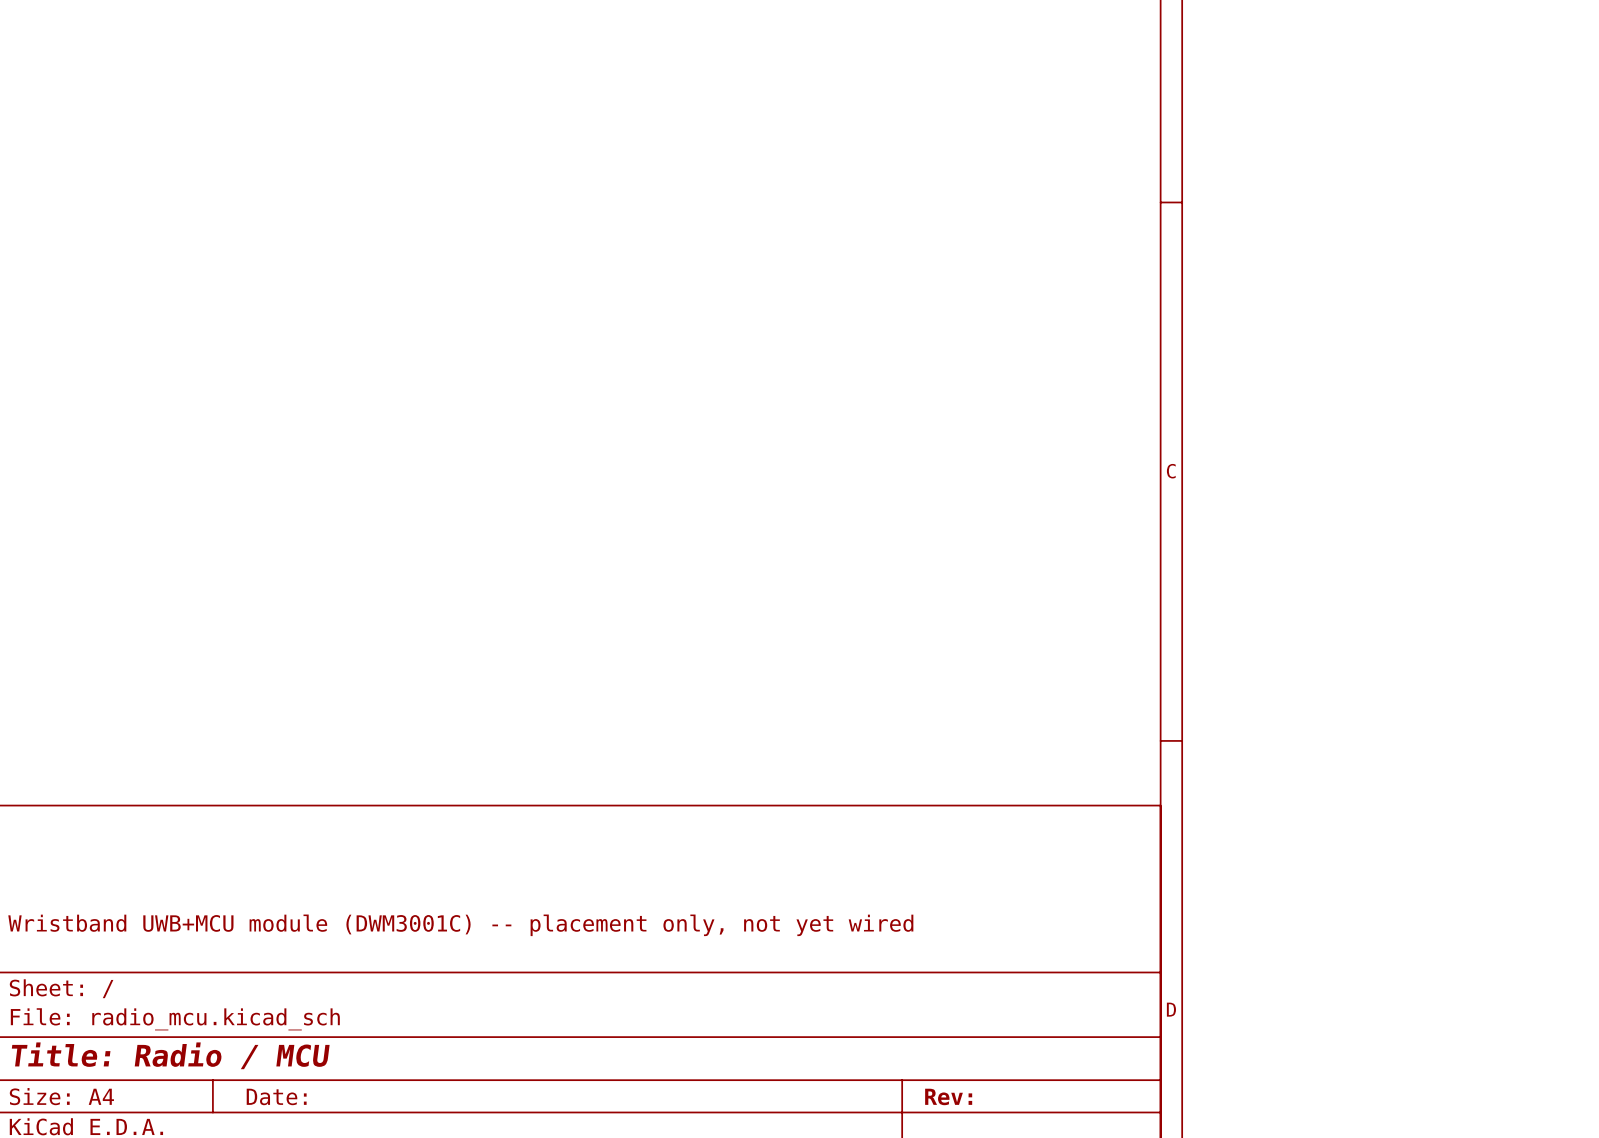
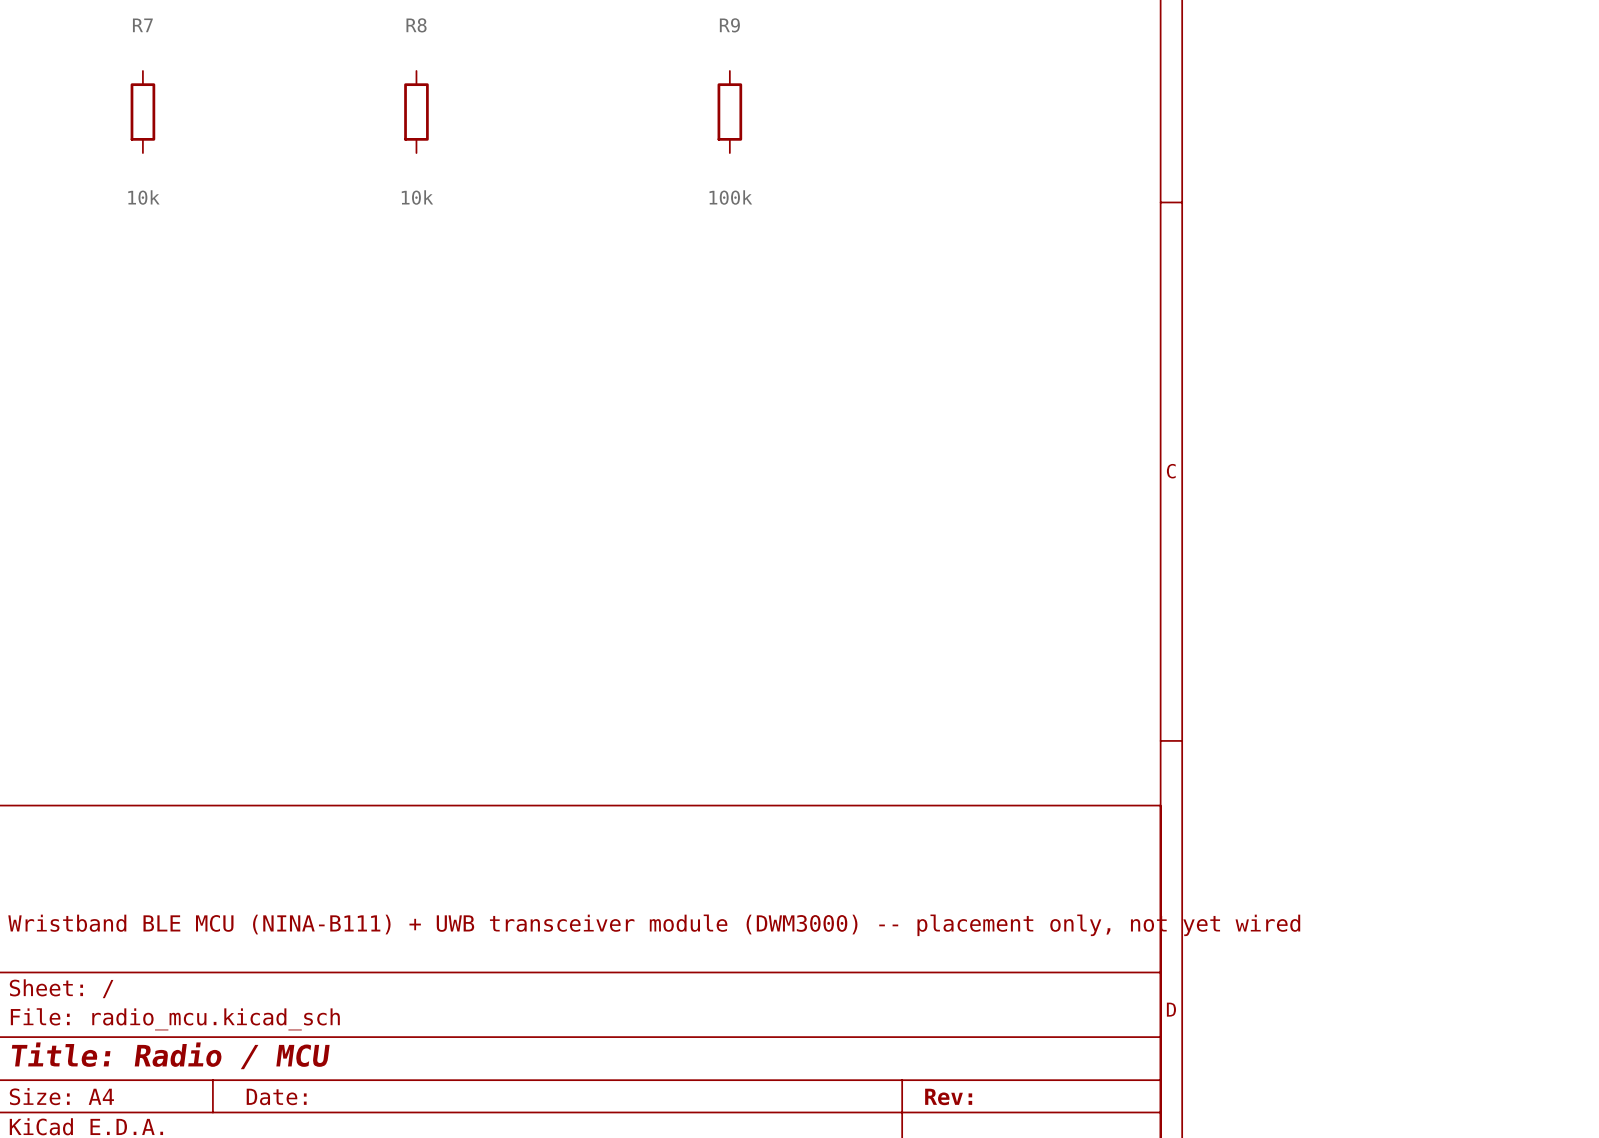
R7: none -> 10k (142, 112)
R8: none -> 10k (416, 112)
R9: none -> 100k (729, 112)
title block: Wristband UWB+MCU module (DWM3001C) -- placement only, not yet wired (460, 925) -> Wristband BLE MCU (NINA-B111) + UWB transceiver module (DWM3000) -- placement only, not yet wired (654, 925)

